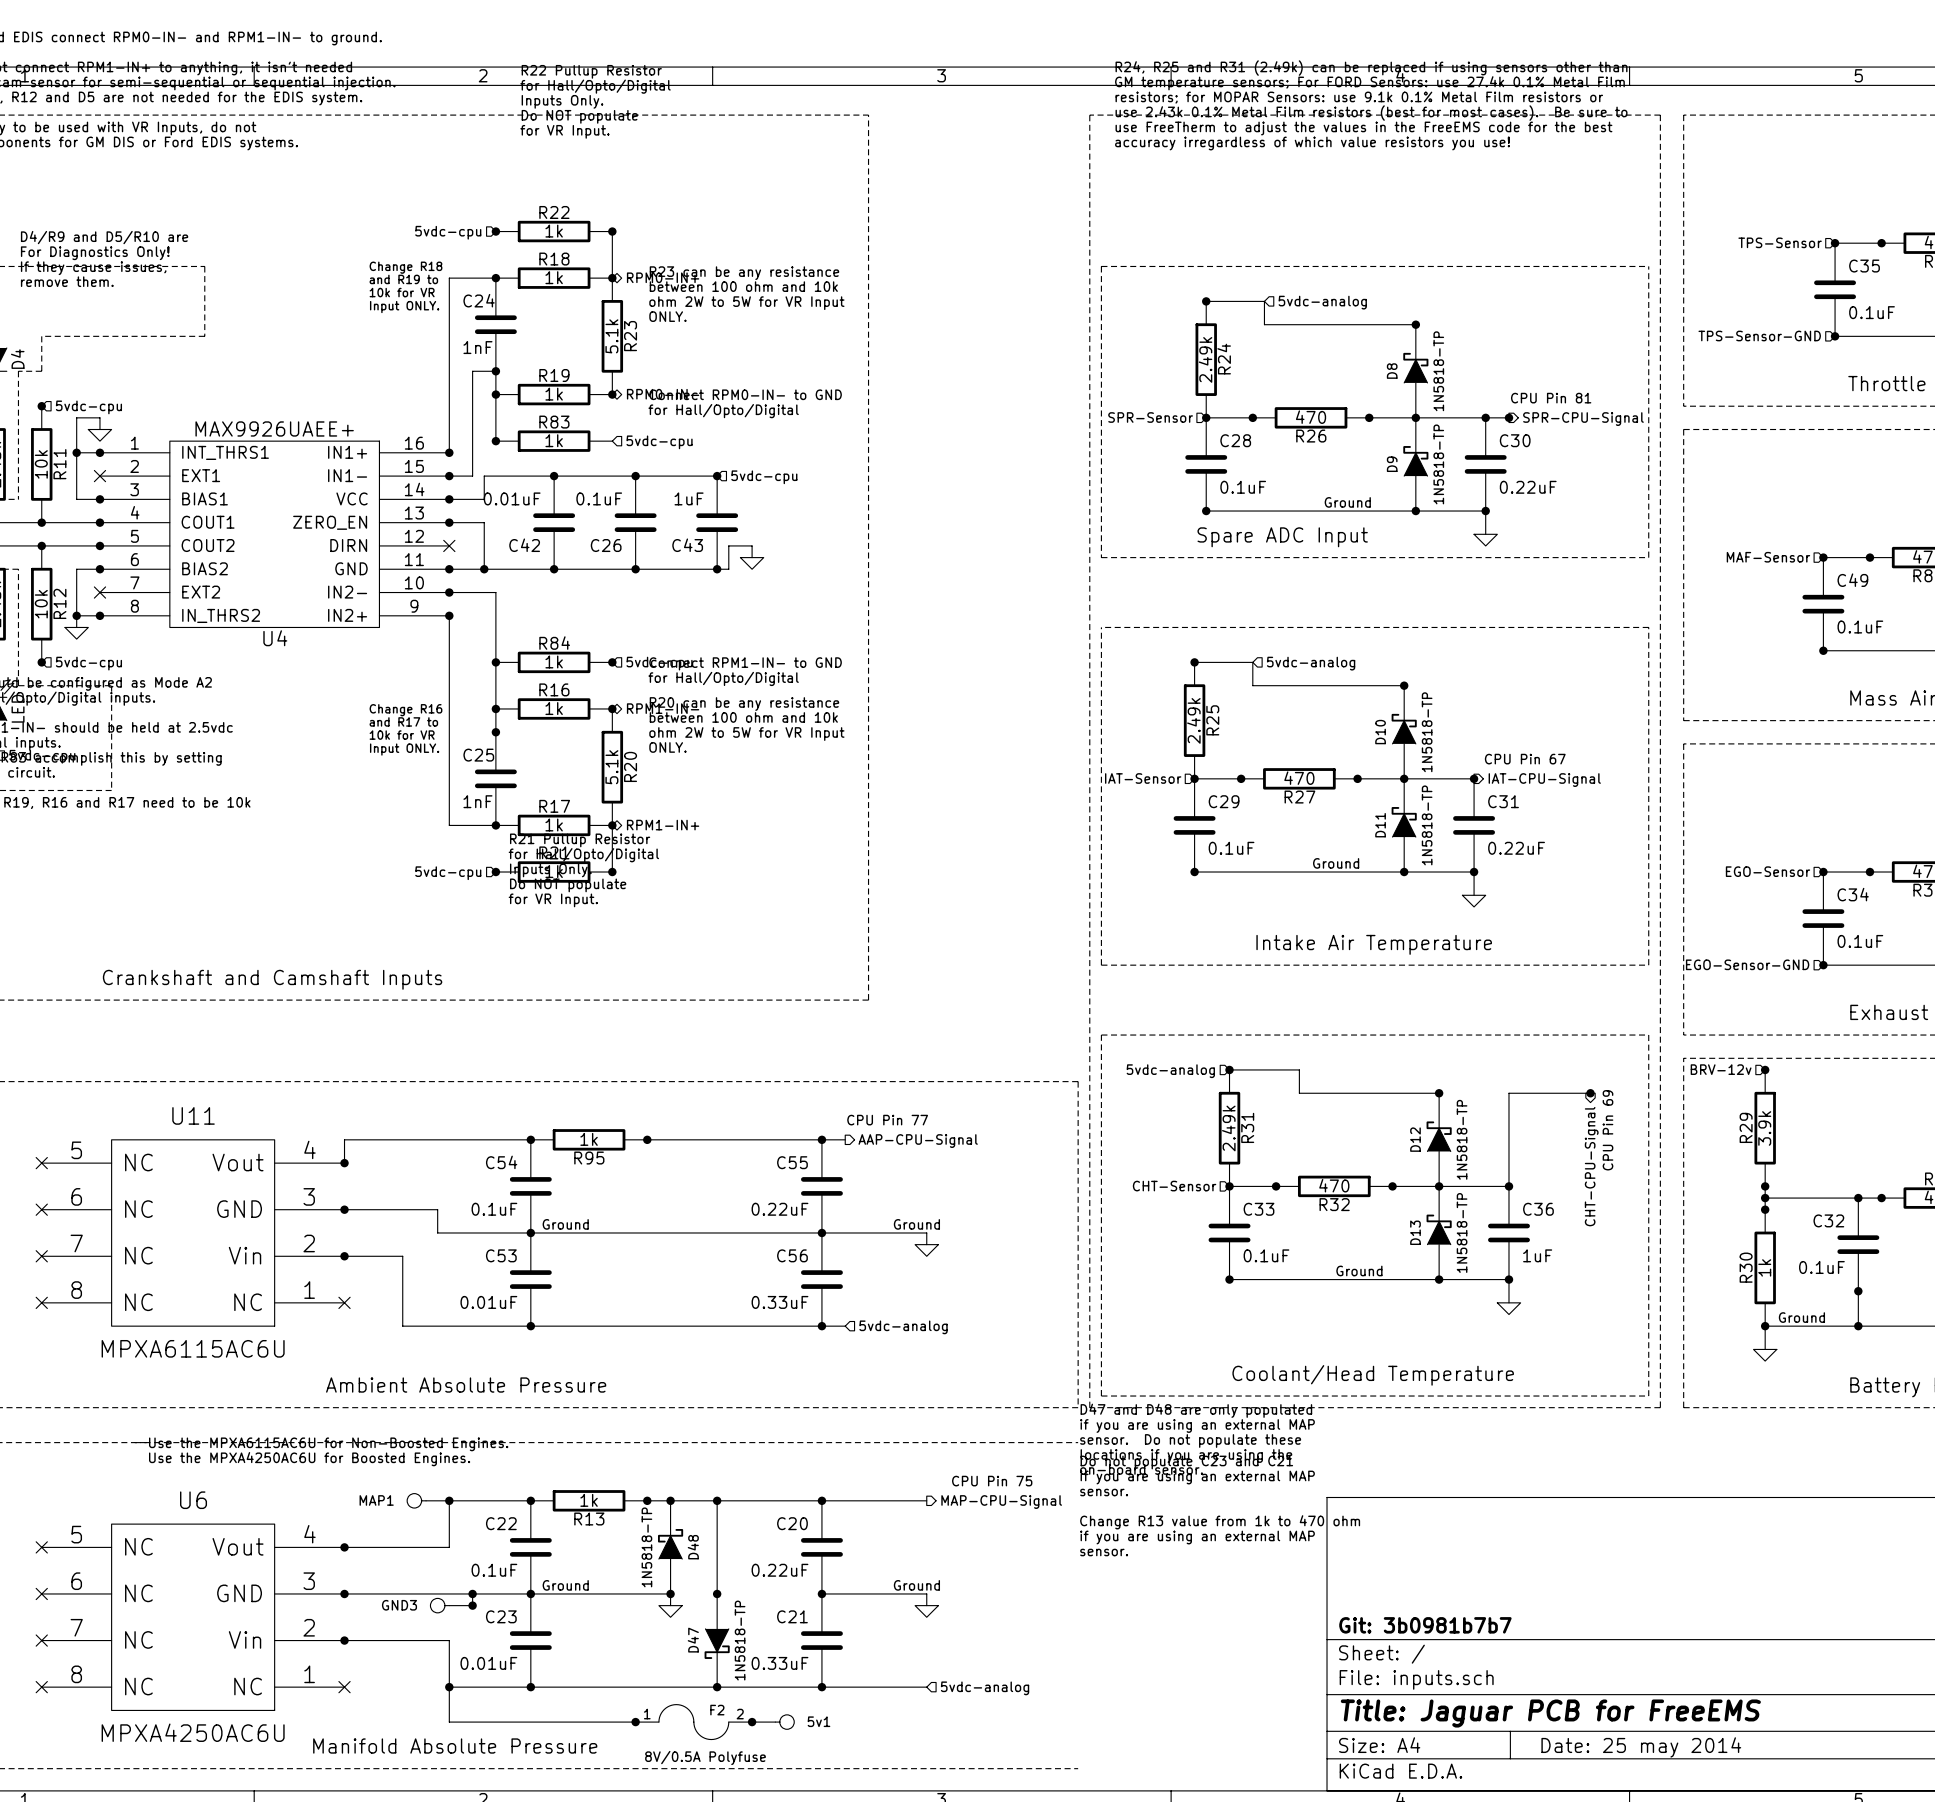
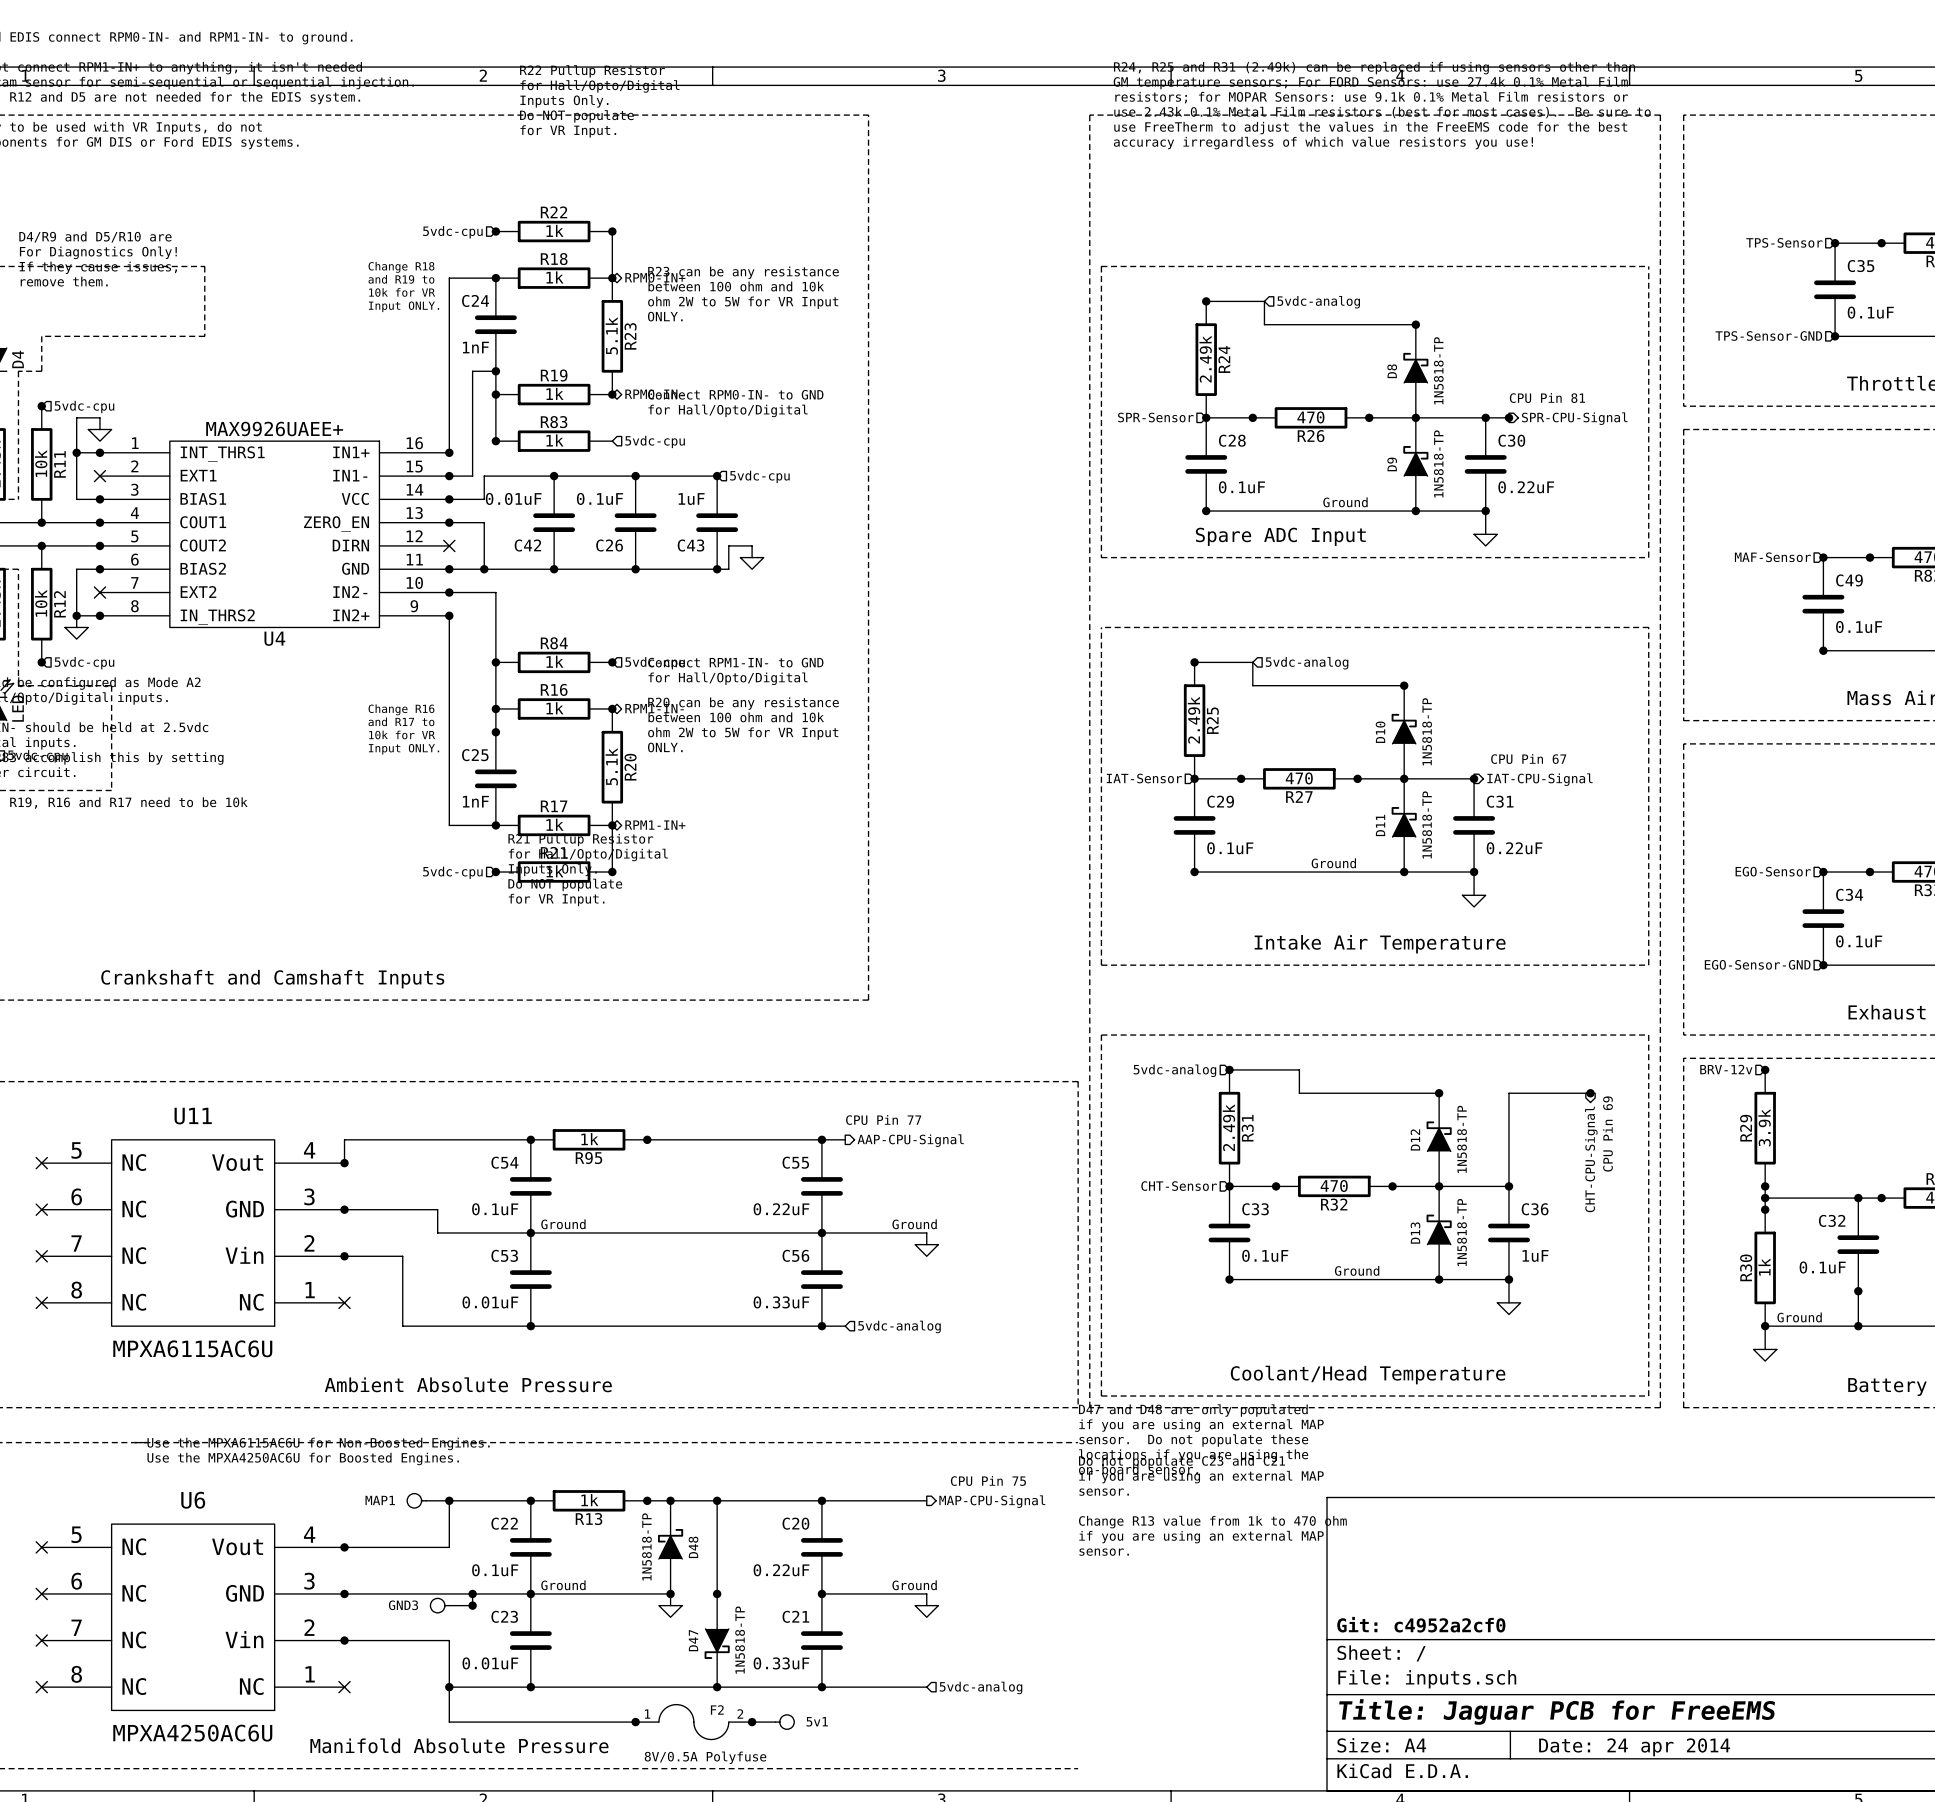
title block: Git: 3b0981b7b7 (1425, 1625) -> Git: c4952a2cf0 (1421, 1624)
title block: Date: 25 may 2014 (1641, 1747) -> Date: 24 apr 2014 (1634, 1747)

